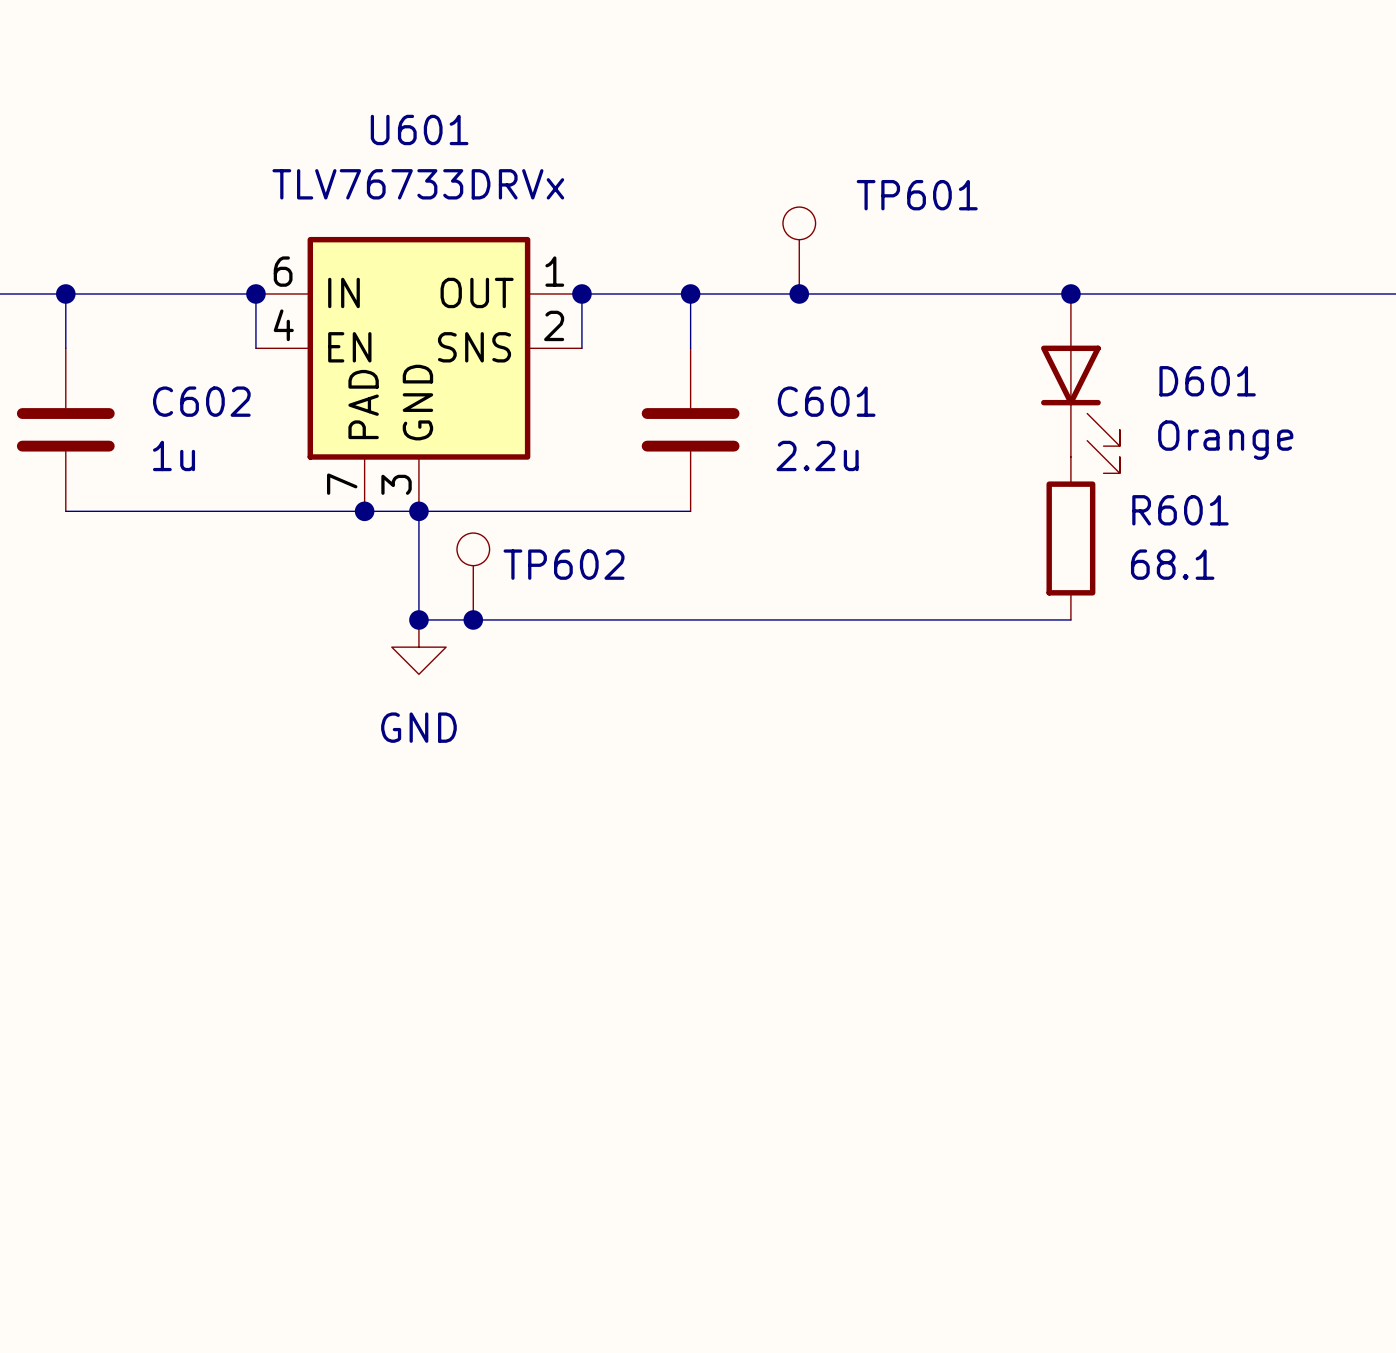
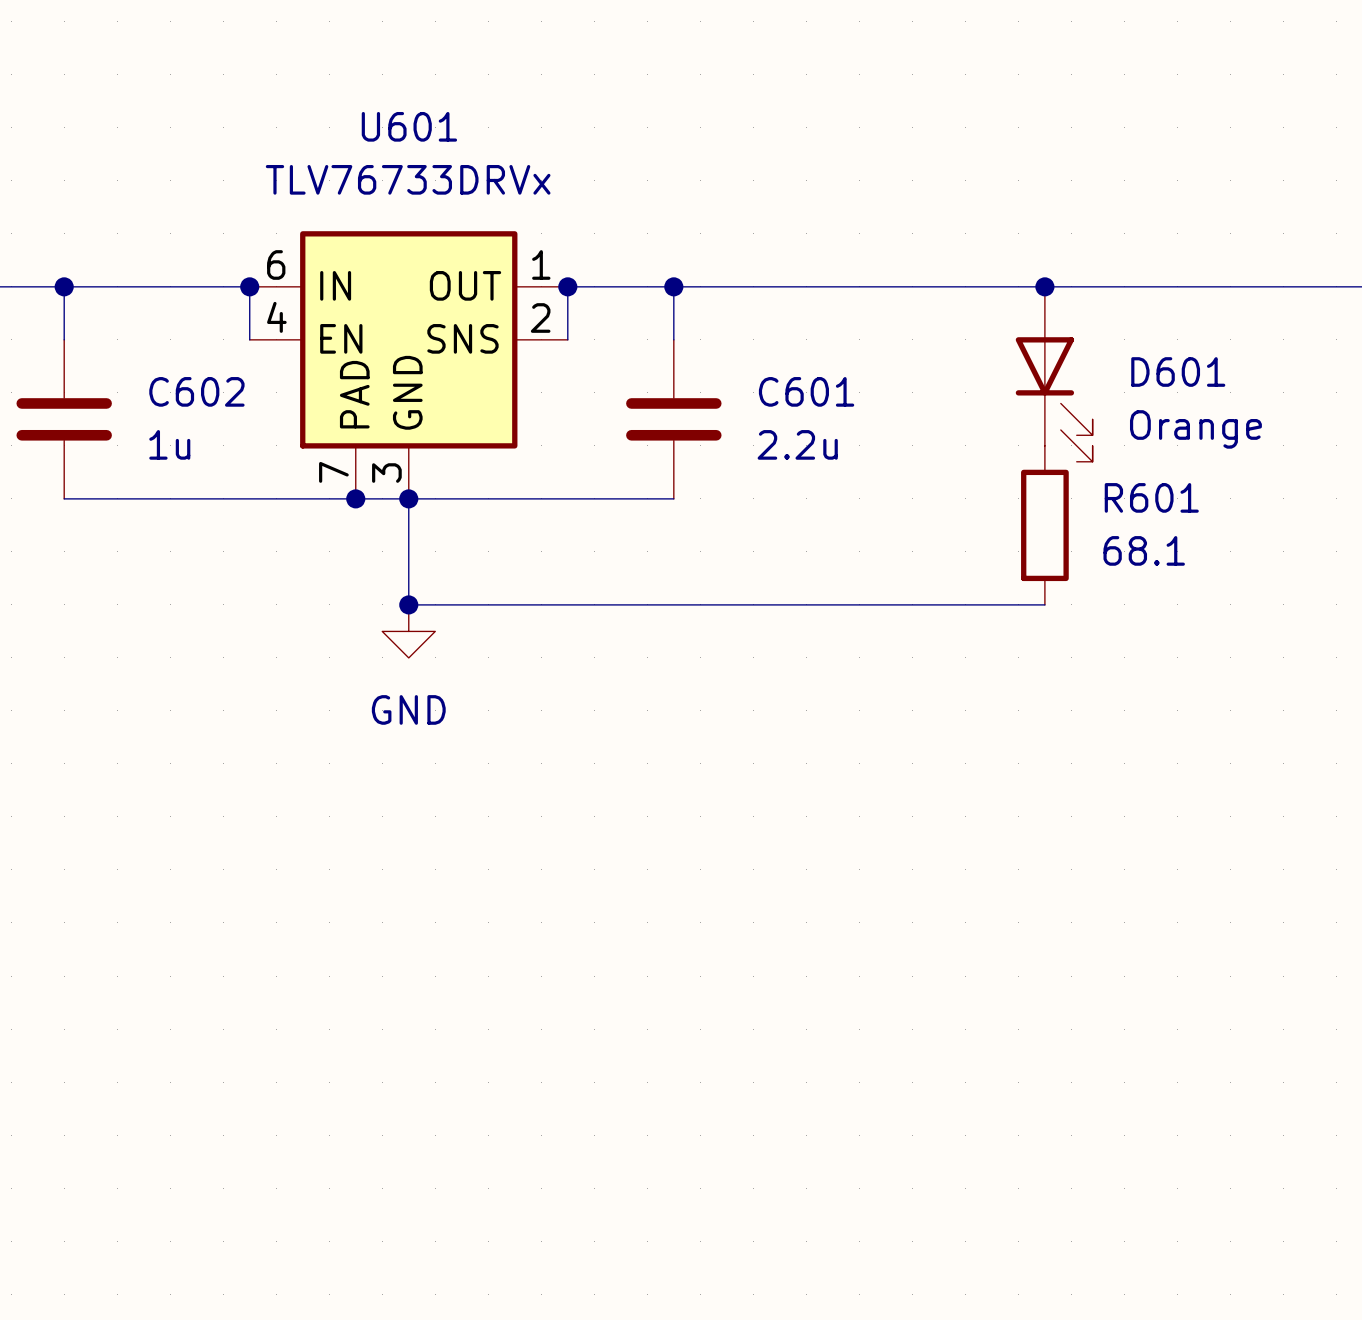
TP601: (799, 250) -> none
junction: (799, 293) -> none
TP602: (473, 576) -> none
junction: (473, 619) -> none

